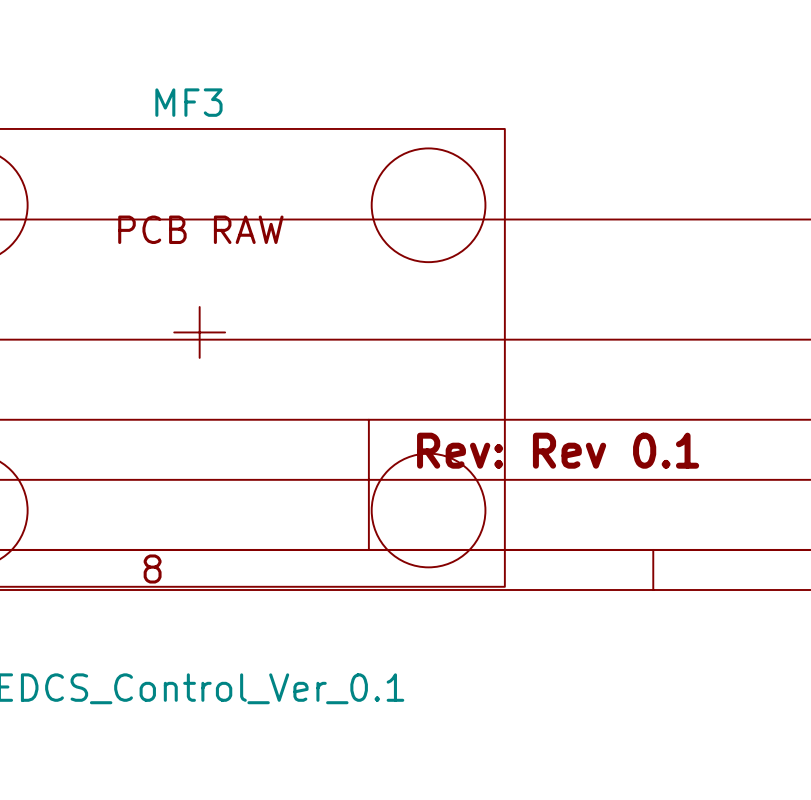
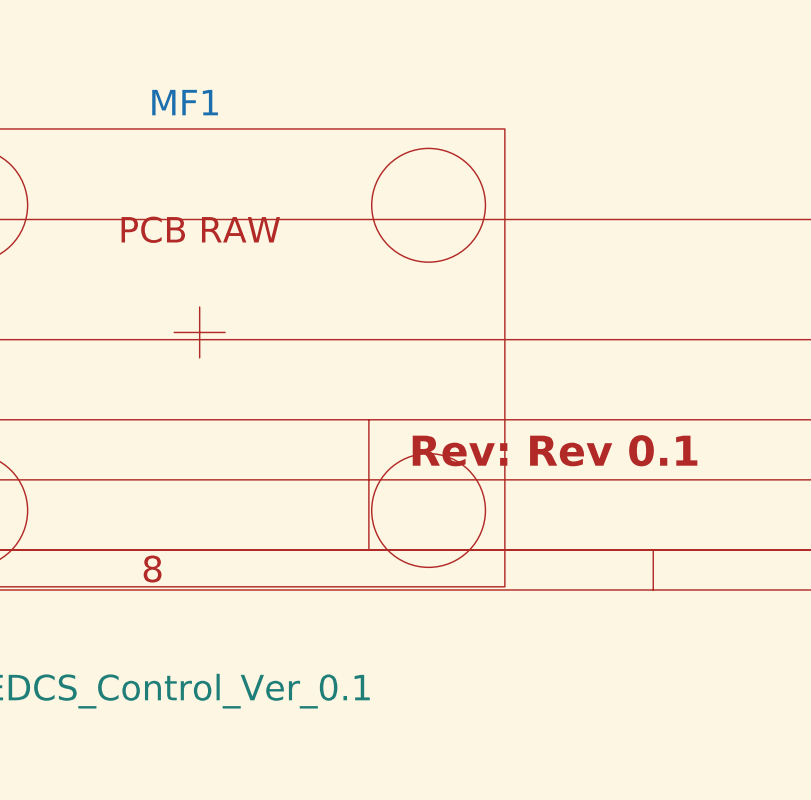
MF3 name: MF3 (188, 102) -> MF1 (185, 102)

